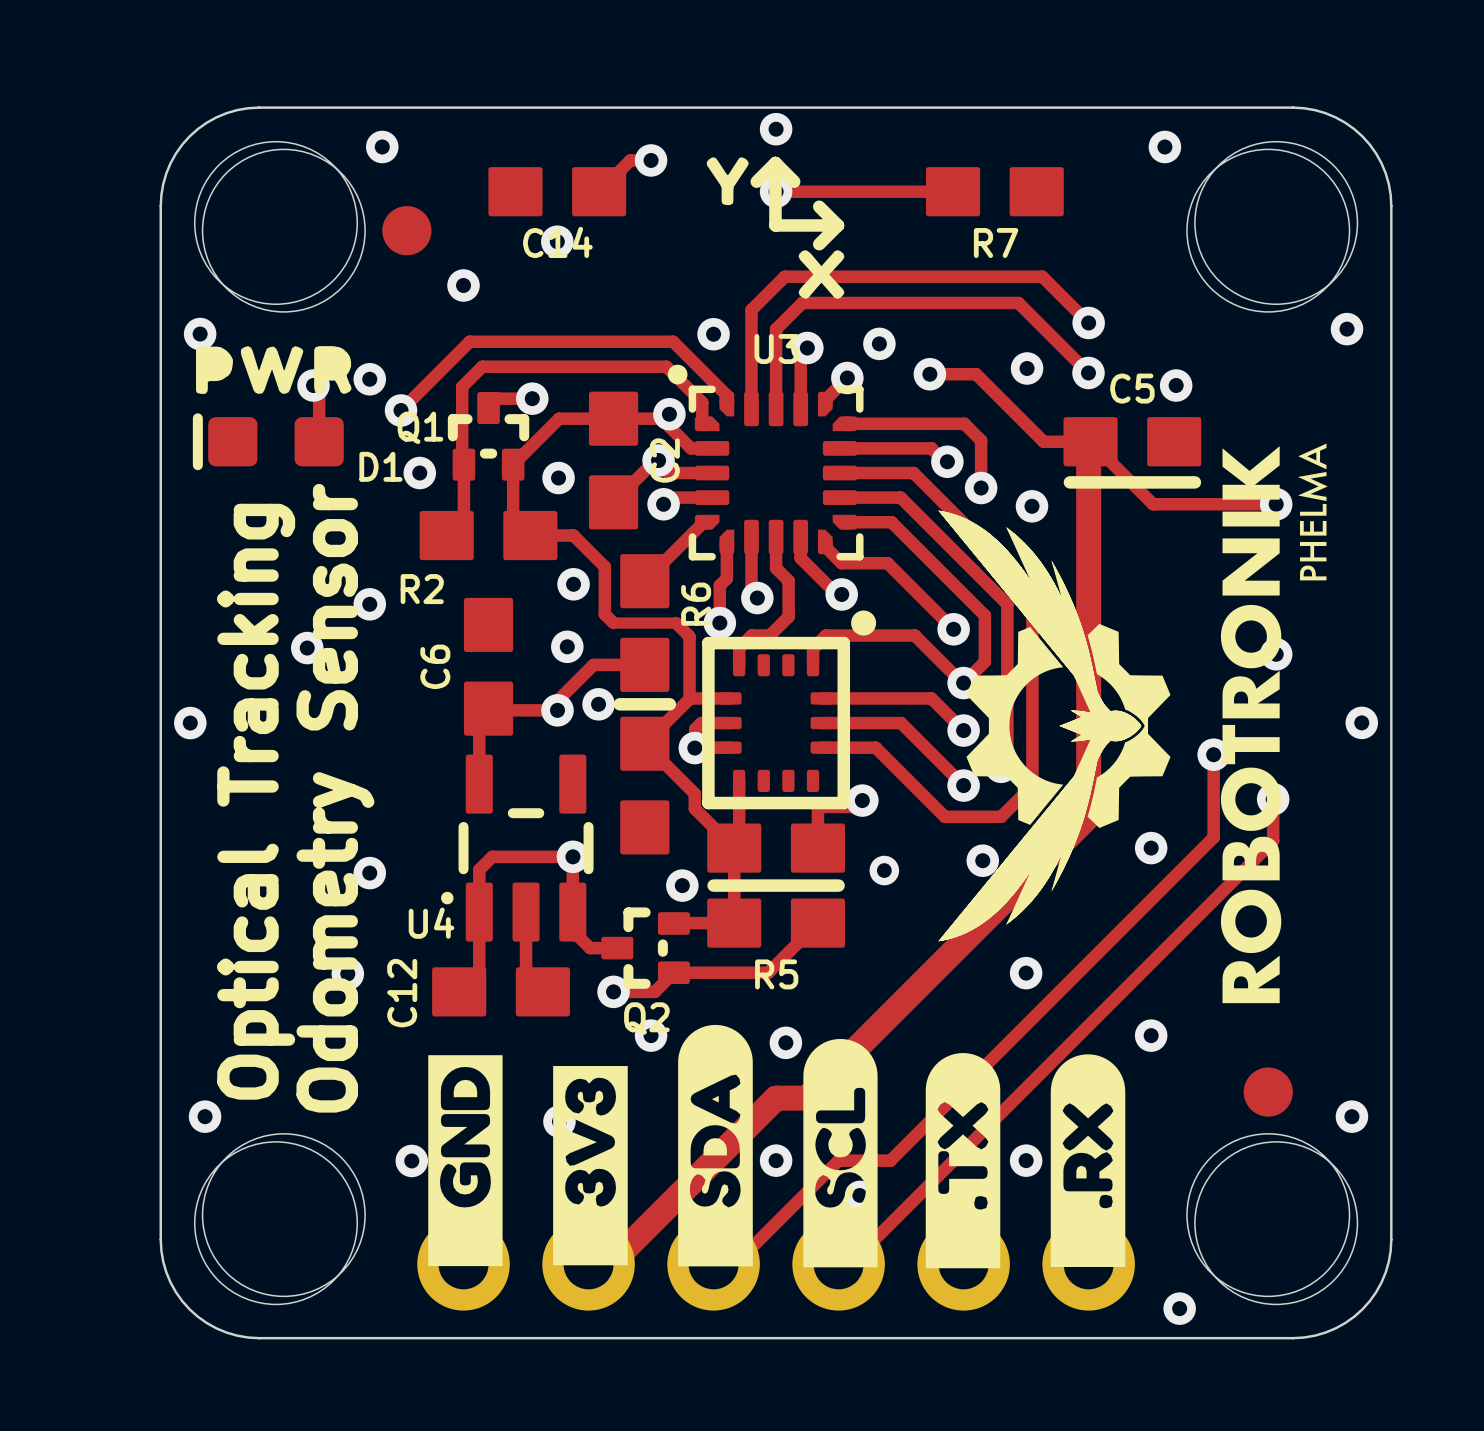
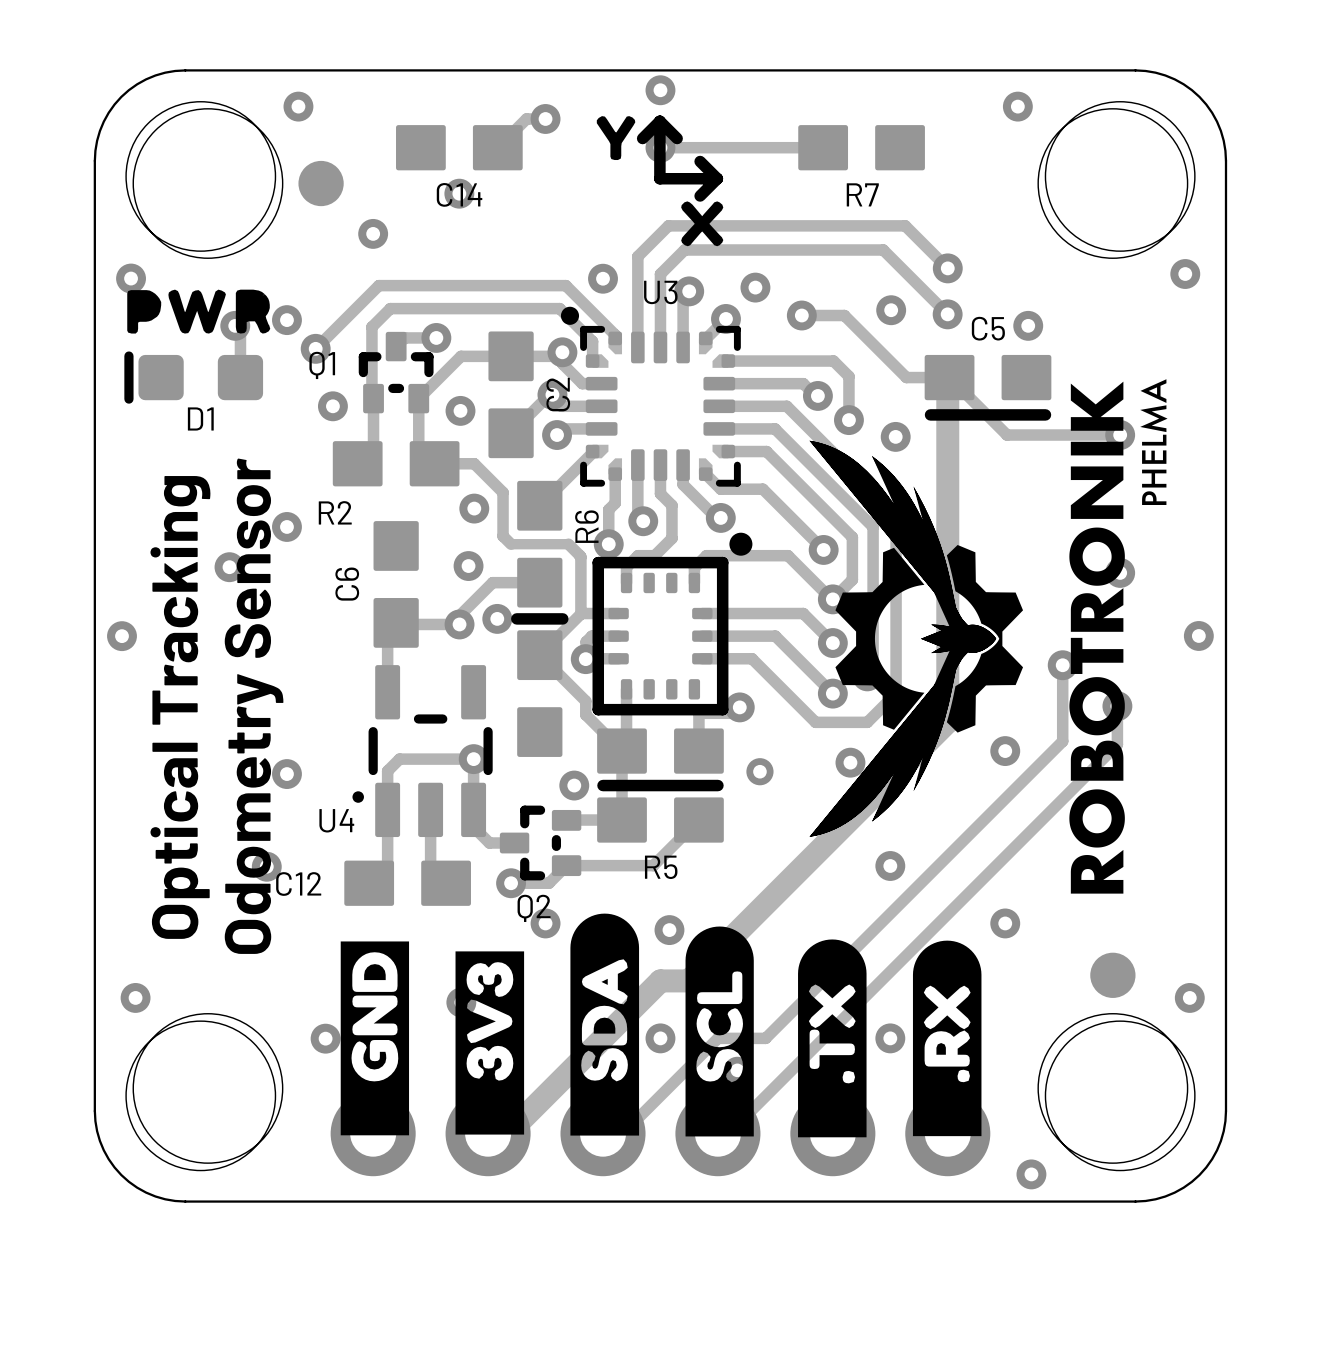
D1 name position: D1 (380, 466) -> D1 (200, 418)
C12 name rotation: 0° (402, 993) -> 90° clockwise (298, 884)

